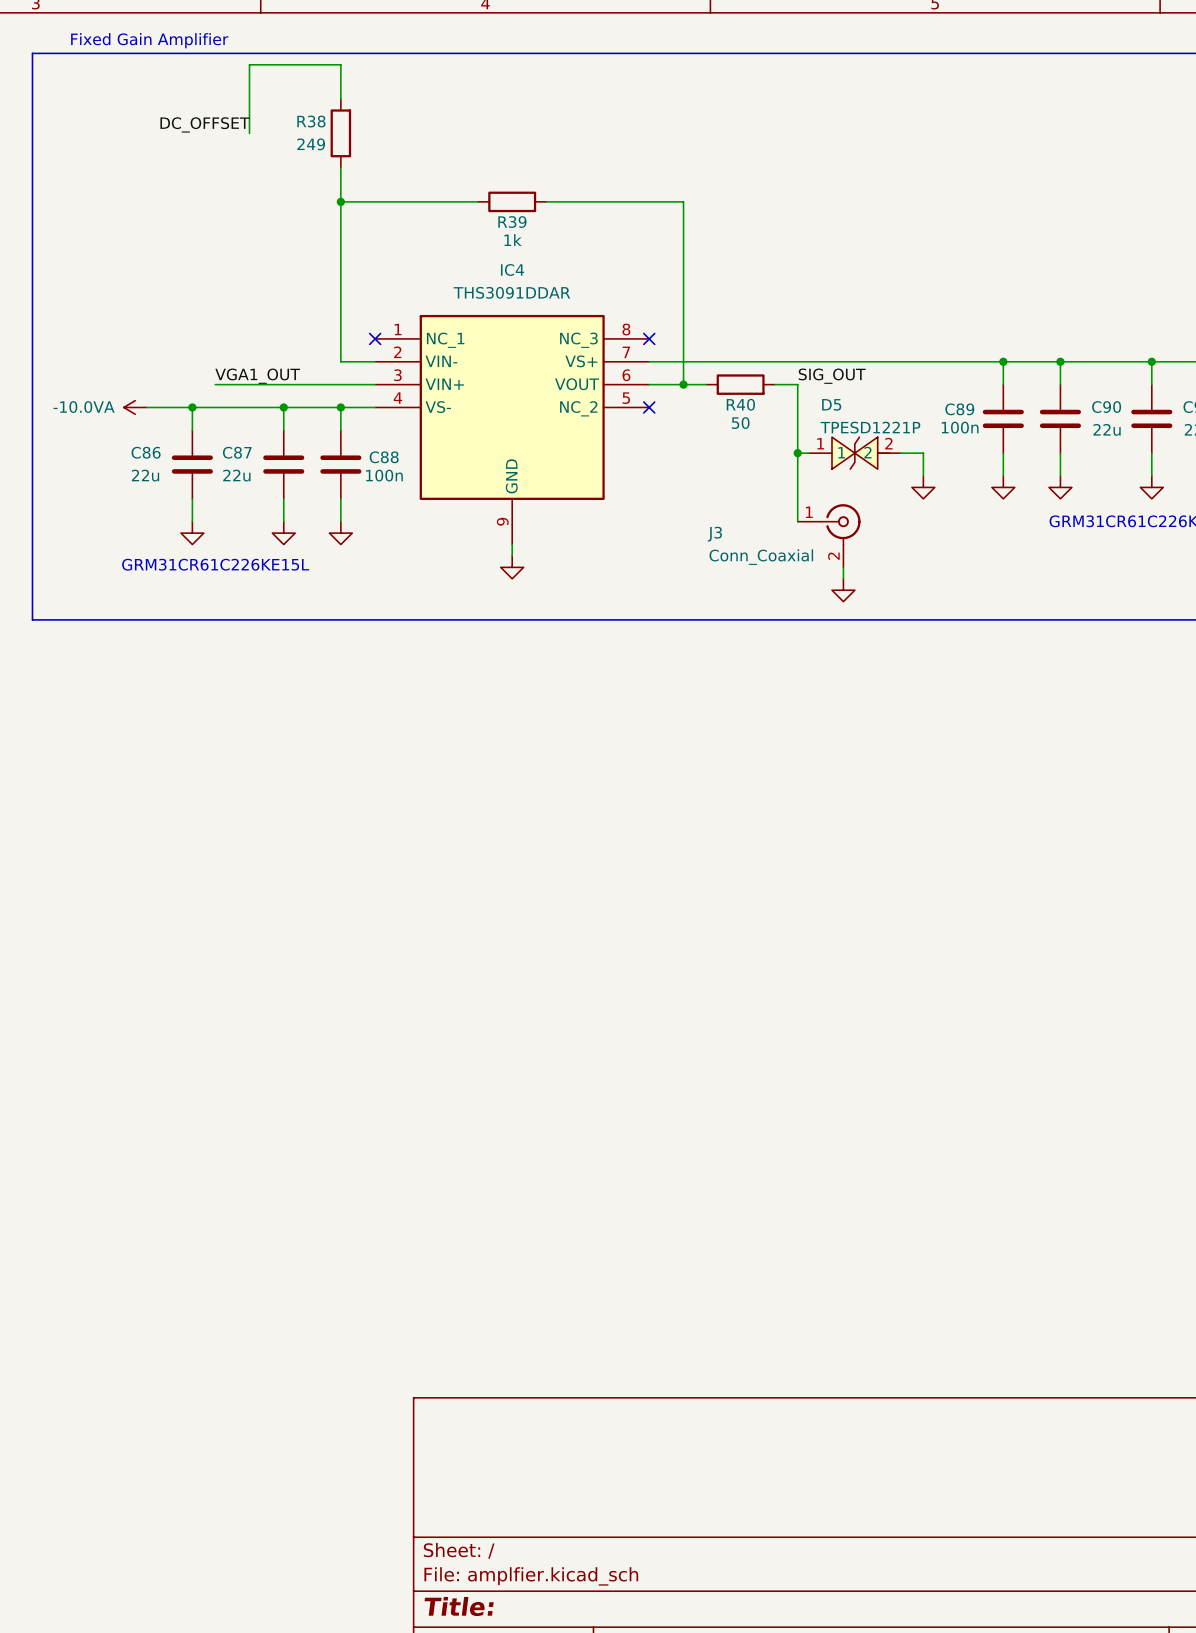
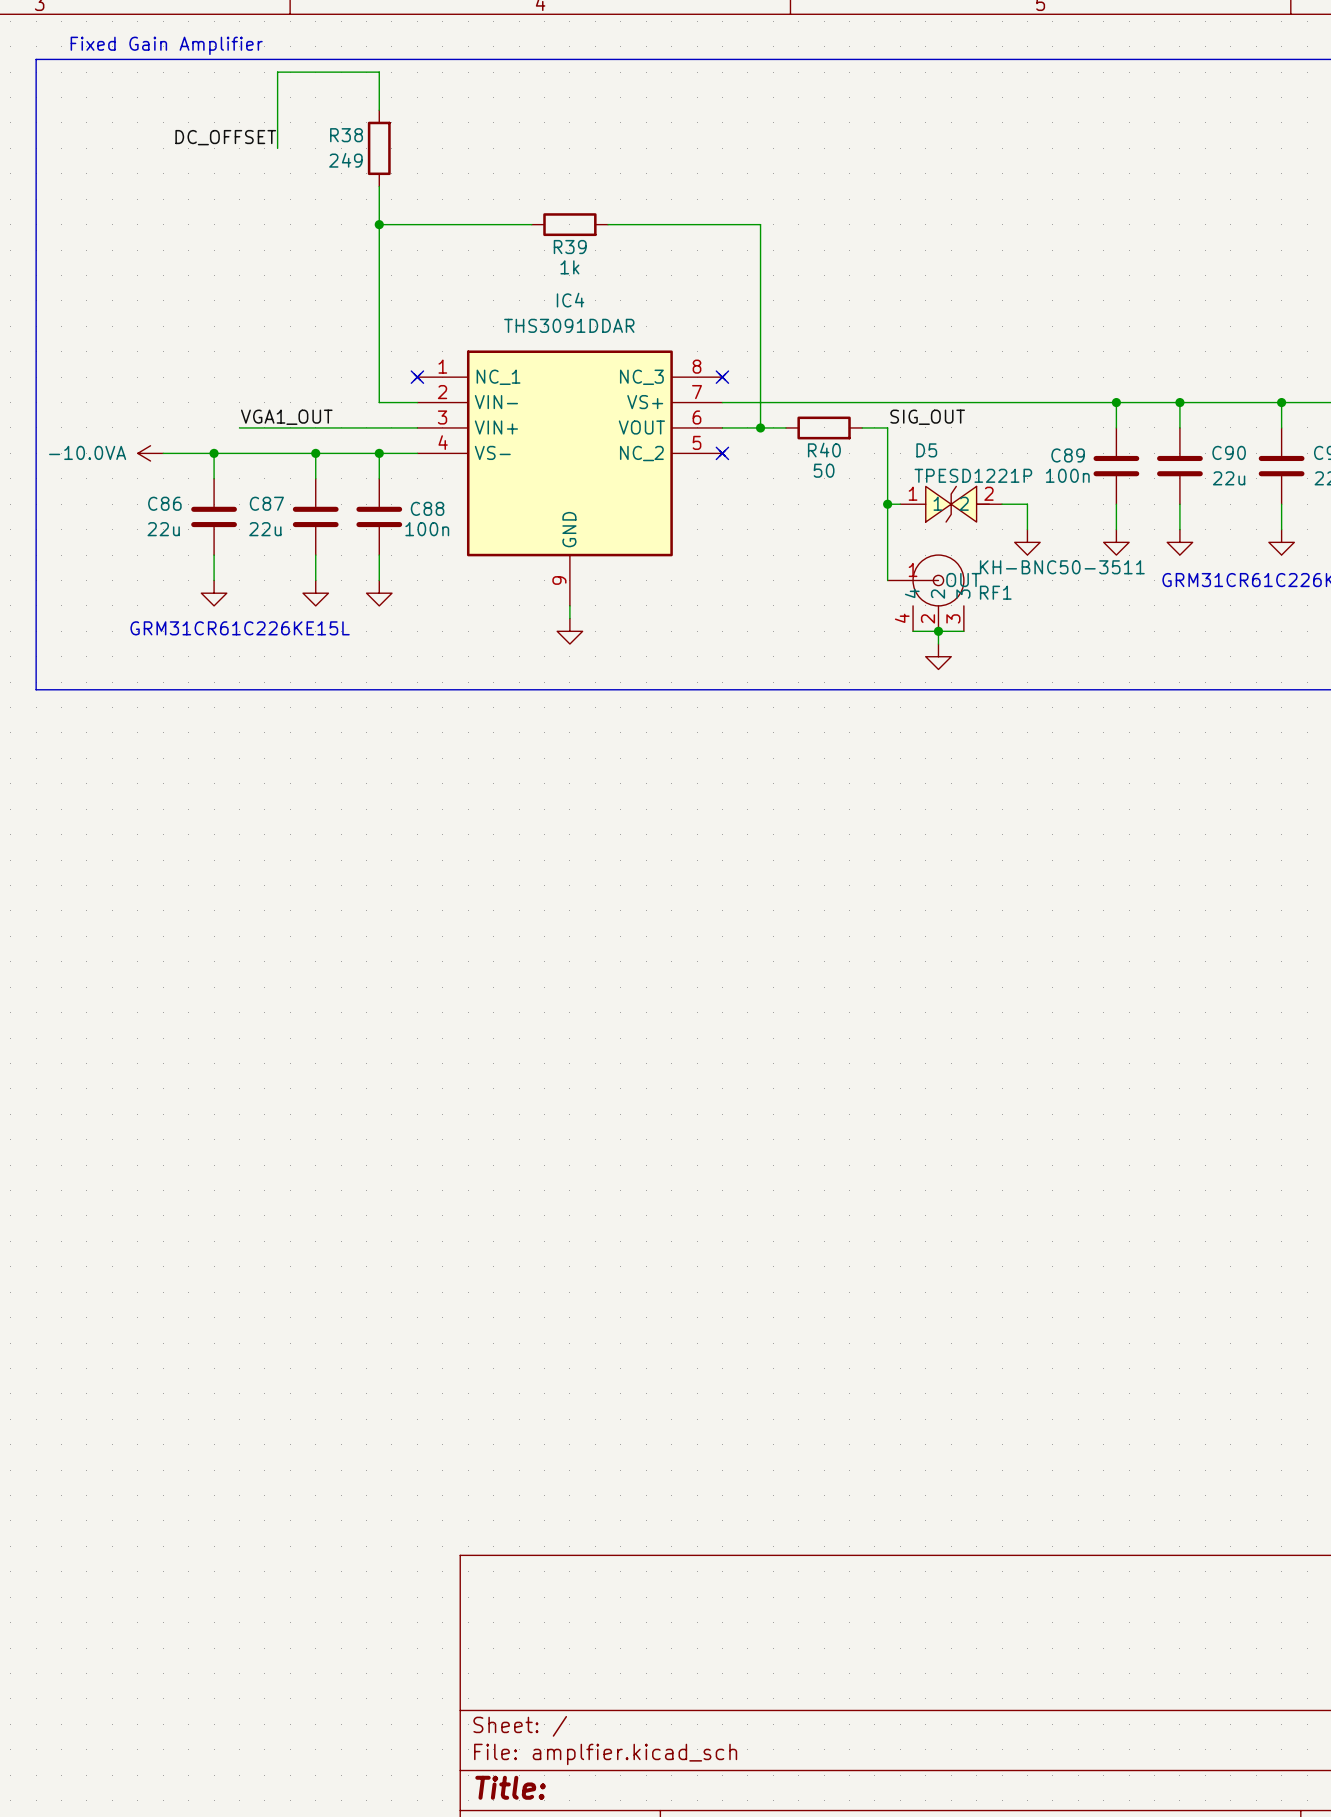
IC4 symbol: [375, 314, 650, 545] -> [414, 350, 726, 606]
RF1: none -> KH-BNC50-3511 (925, 593)
J3: Conn_Coaxial (829, 535) -> none
wire: none -> (913, 631) (963, 631)
junction: none -> (938, 631)

